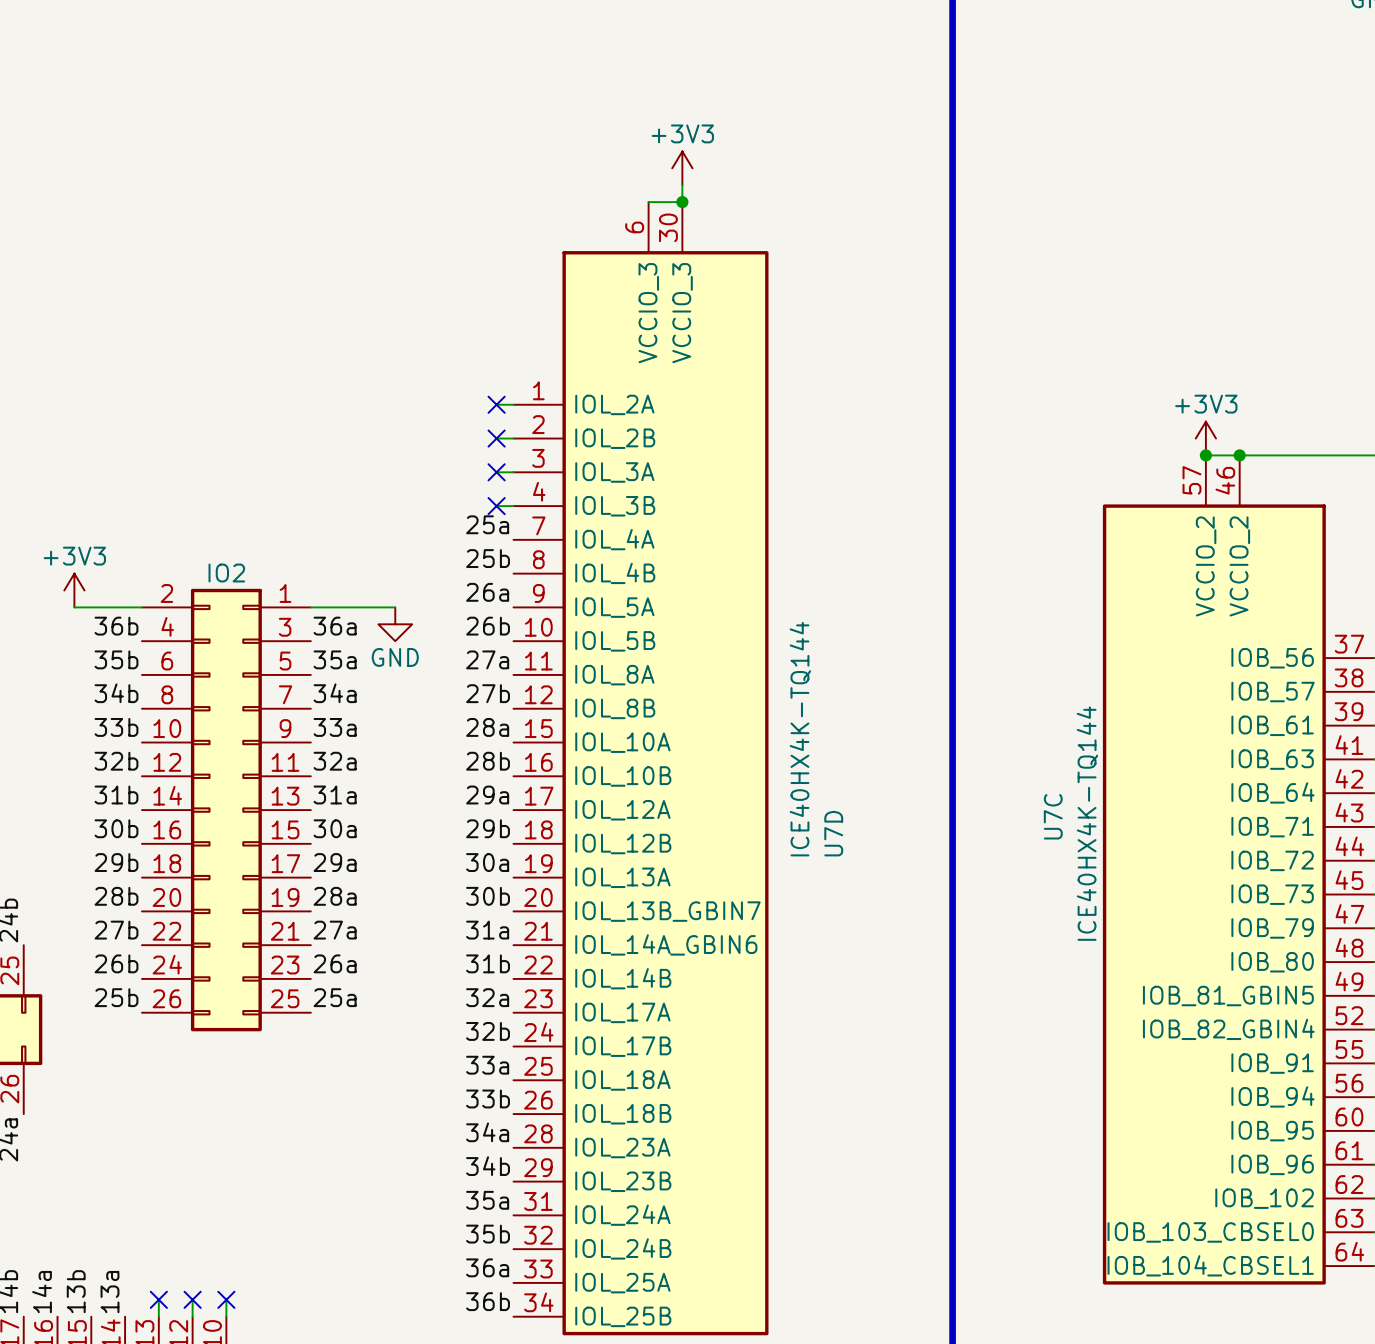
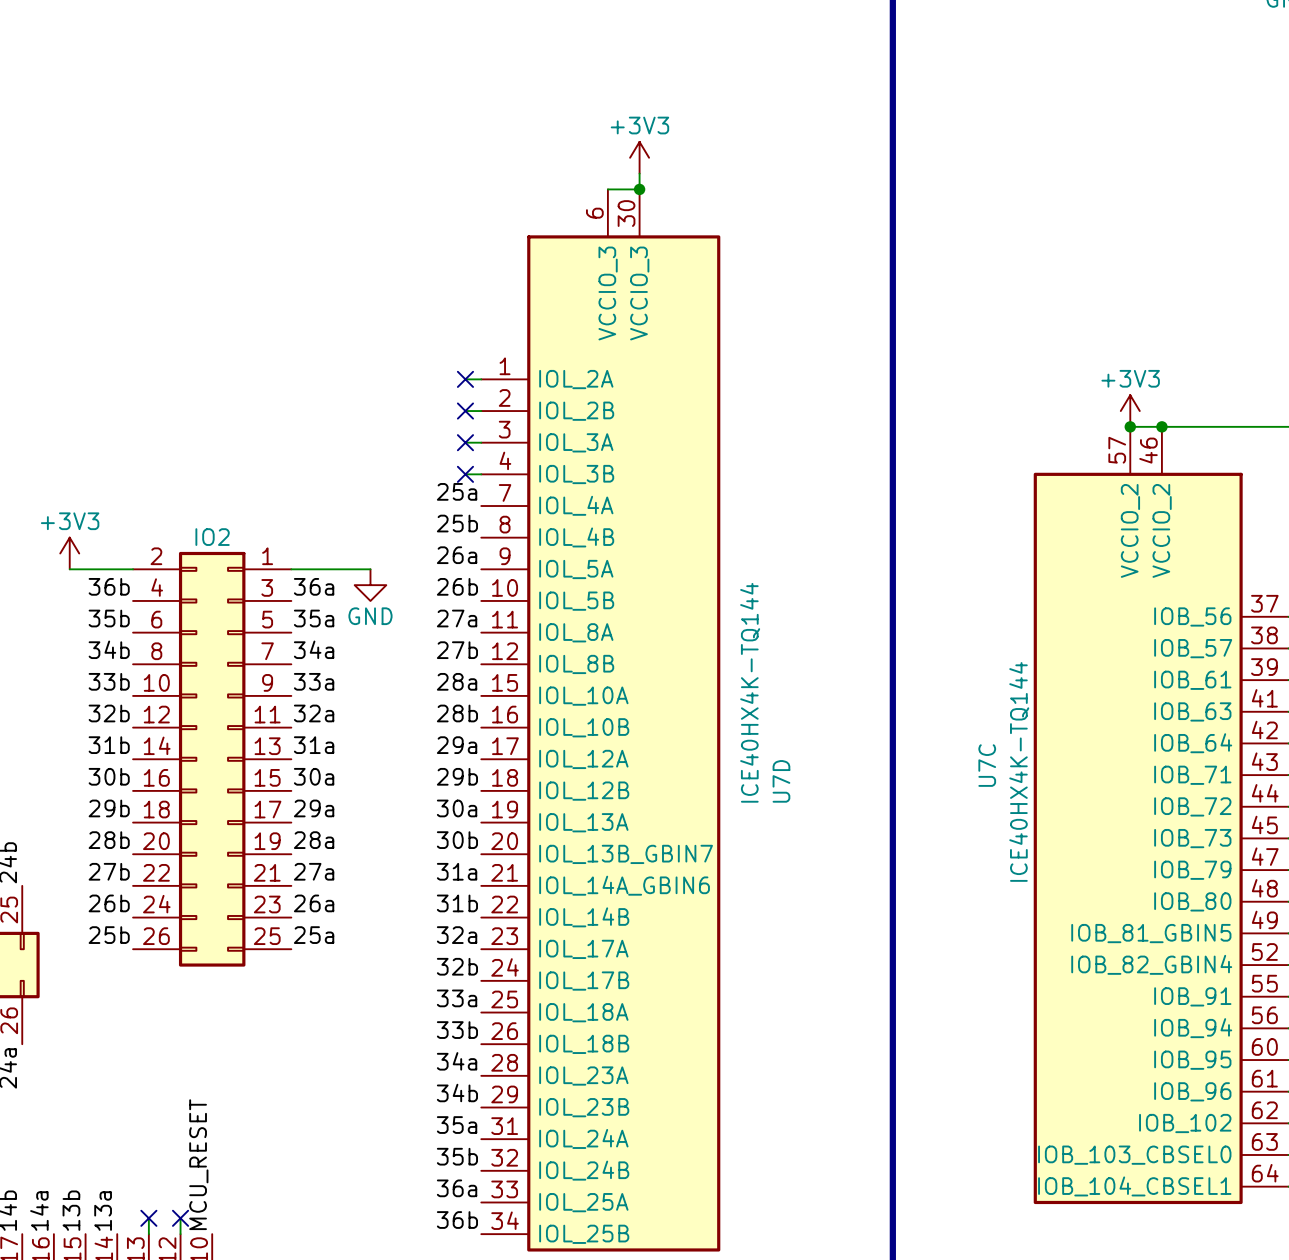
label: none -> MCU_RESET (198, 1164)
wire: (226, 1299) (226, 1316) -> none
no-connect mark: (226, 1299) -> none

